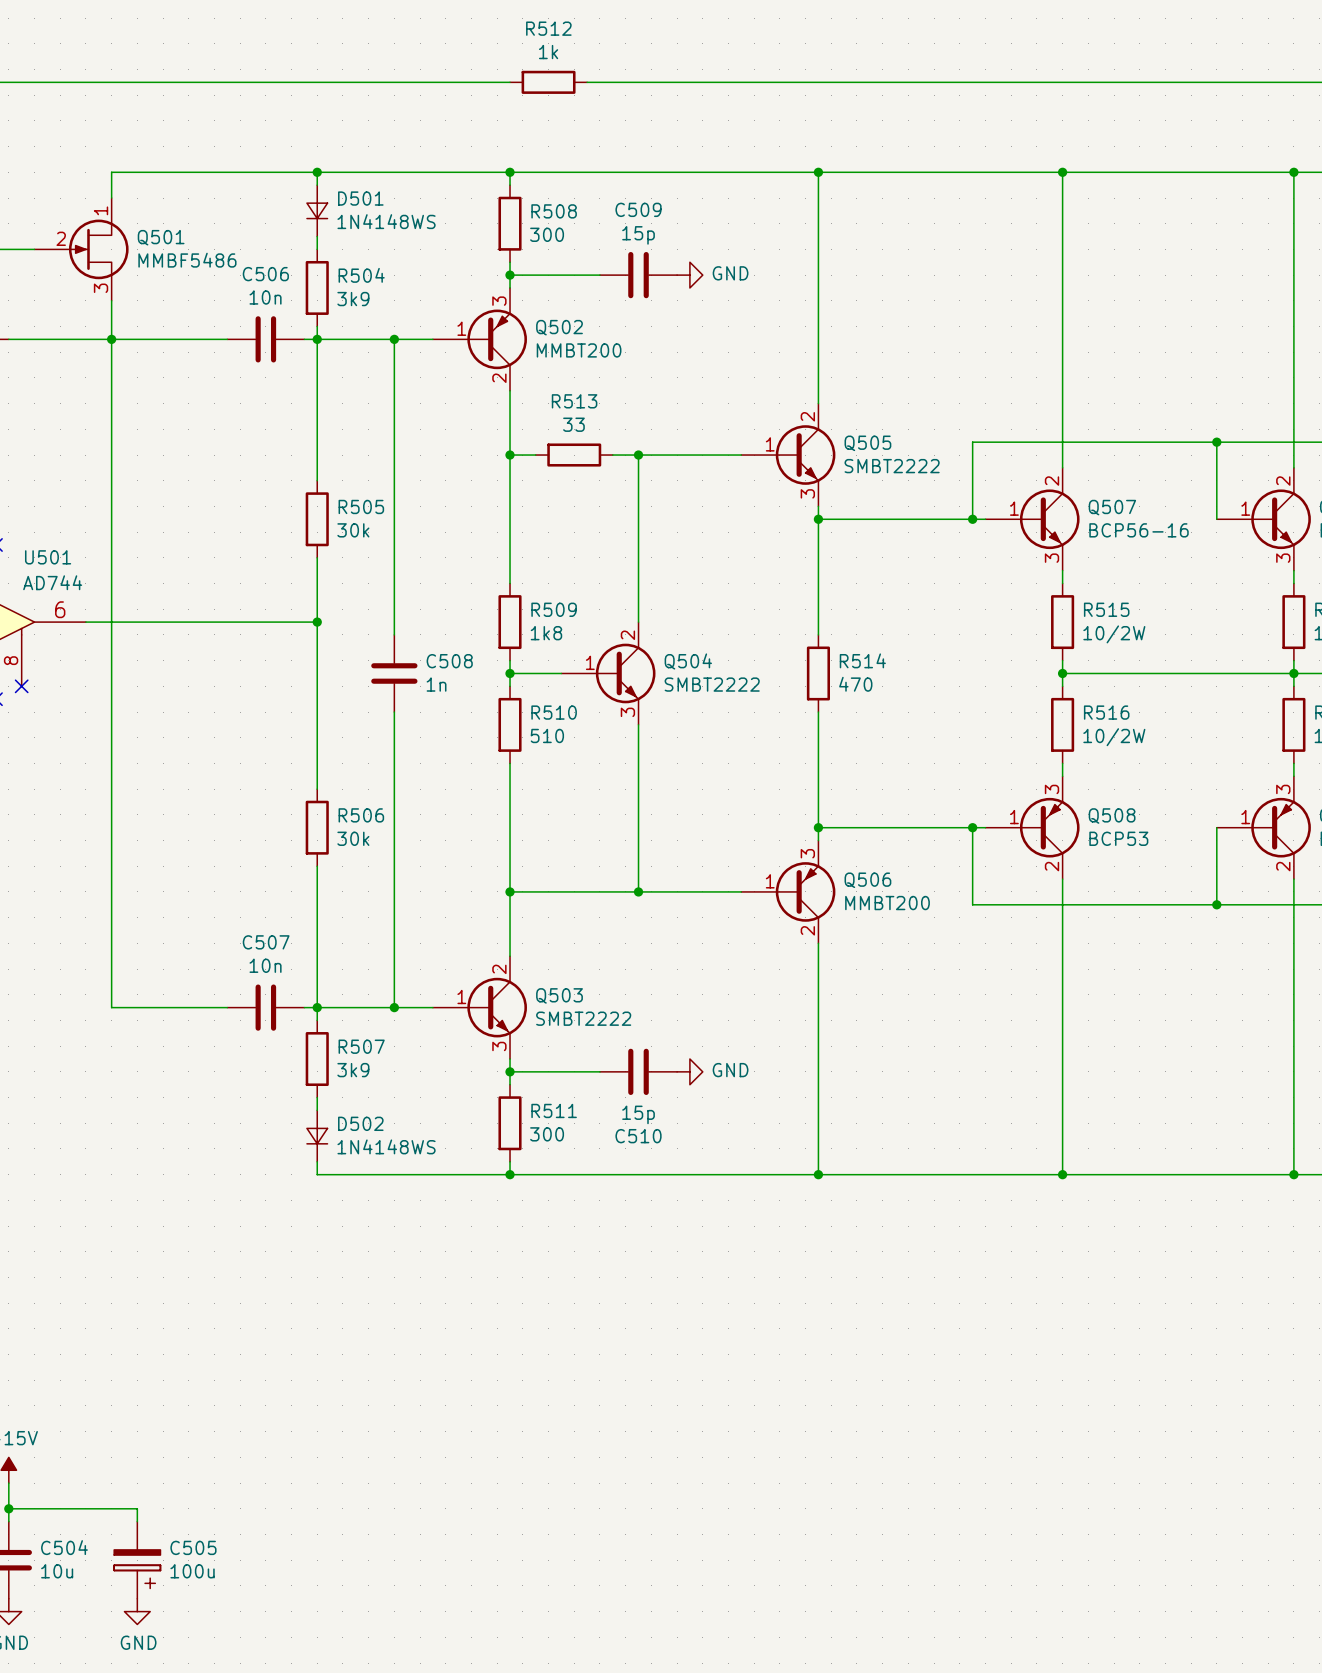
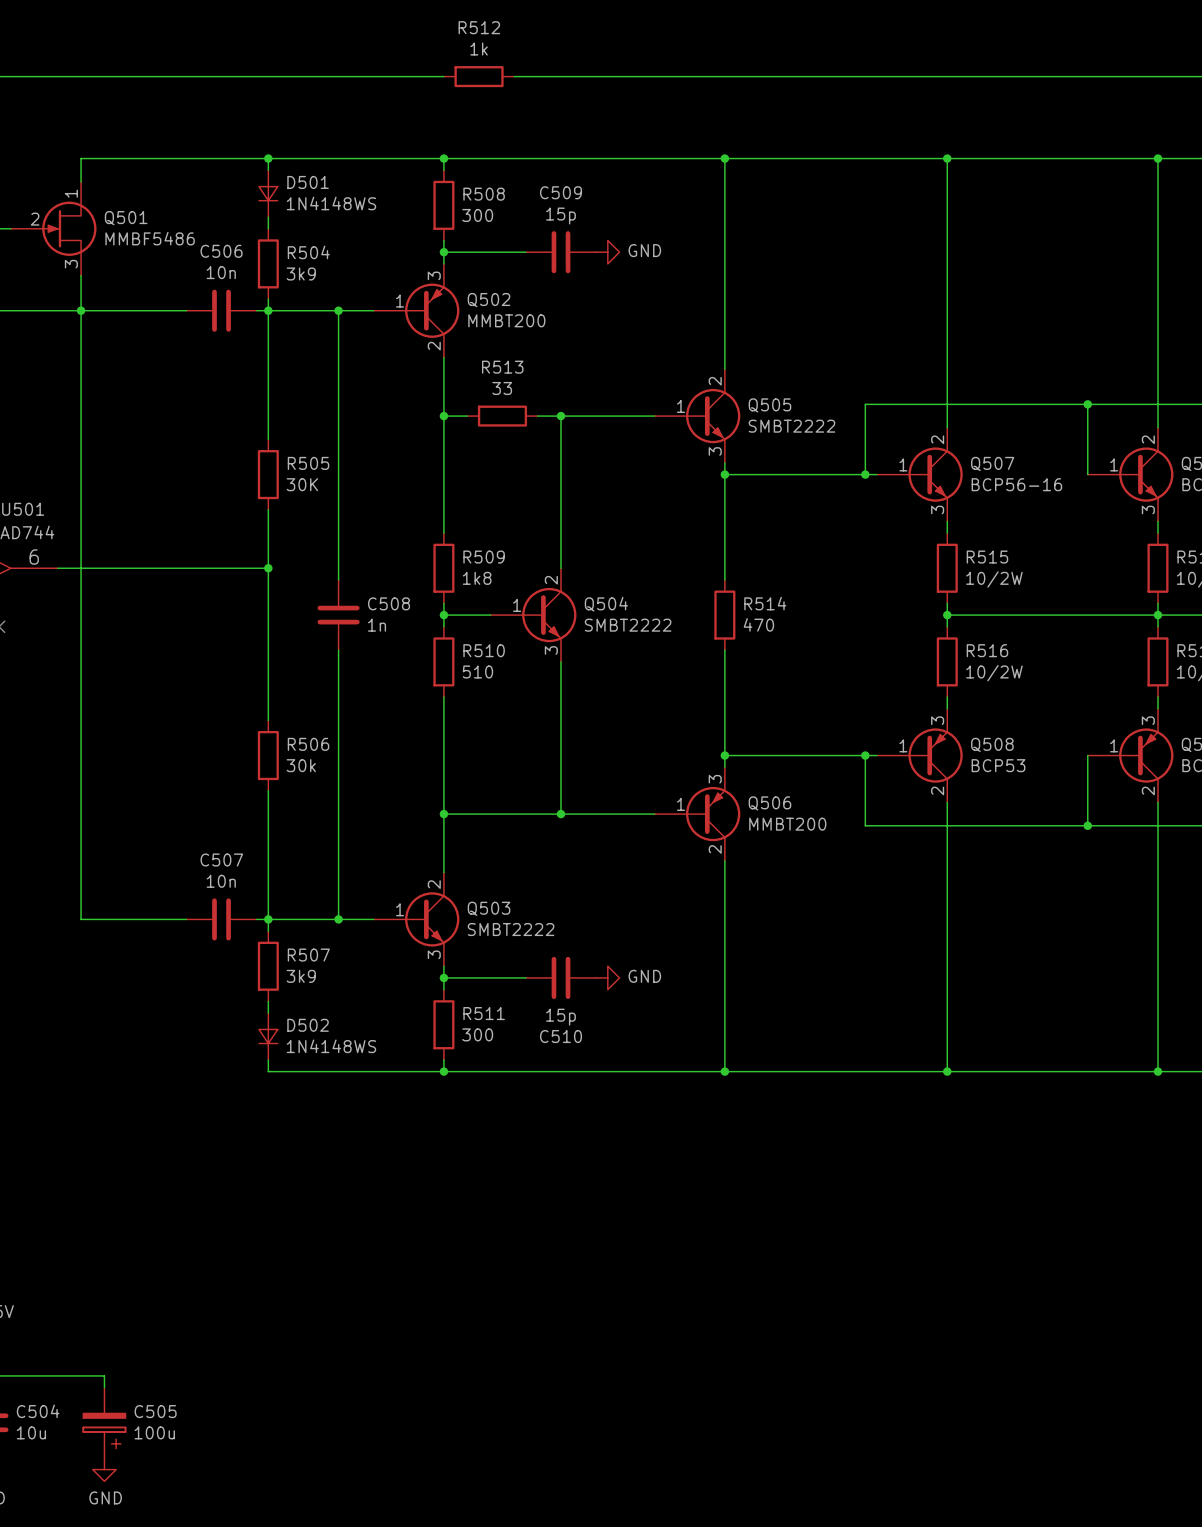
R505 value: 30k (353, 530) -> 30K (302, 484)

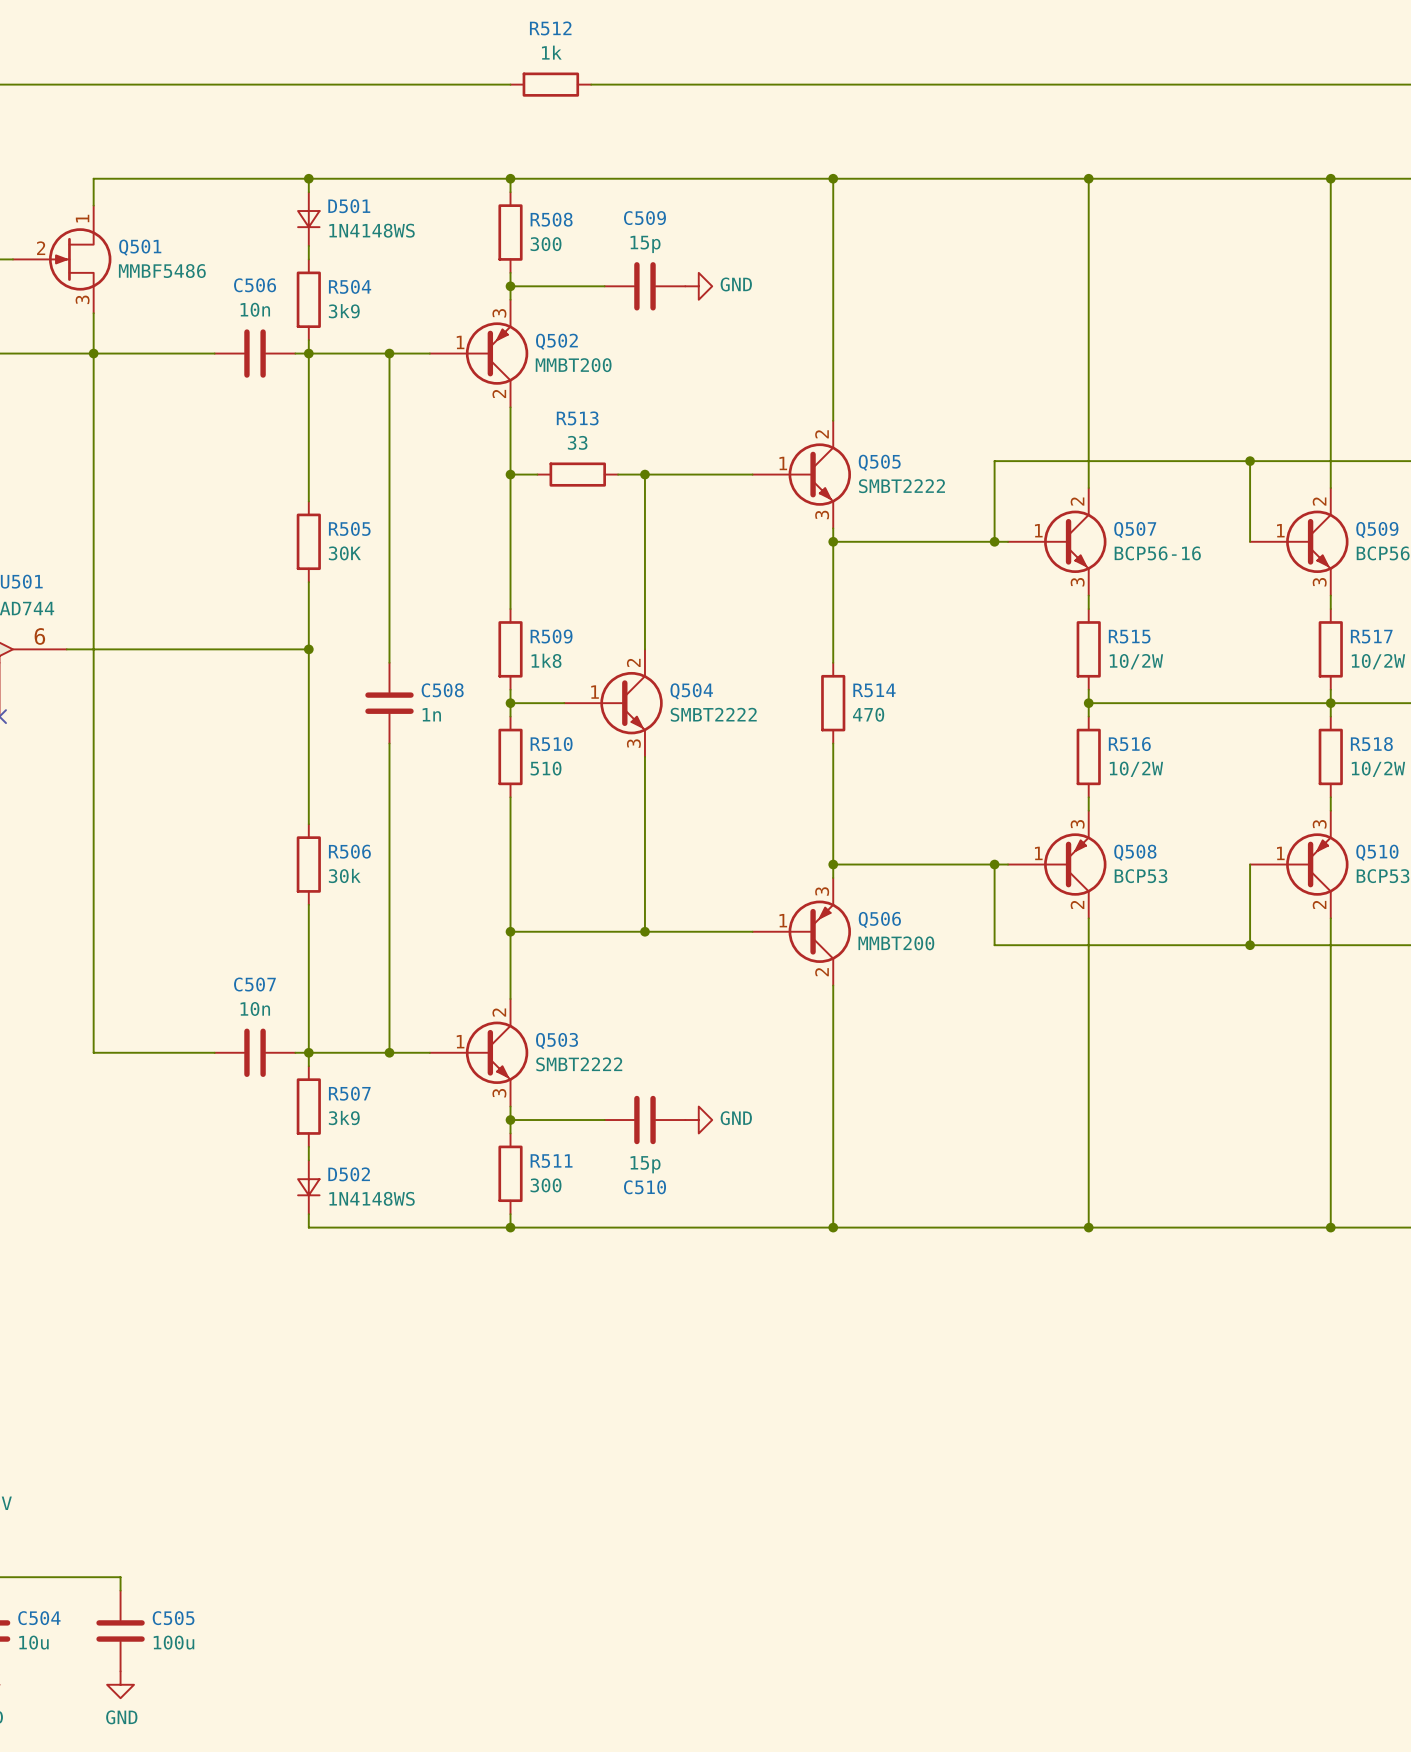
C505 symbol: [83, 1387, 126, 1458] -> [96, 1590, 145, 1672]

